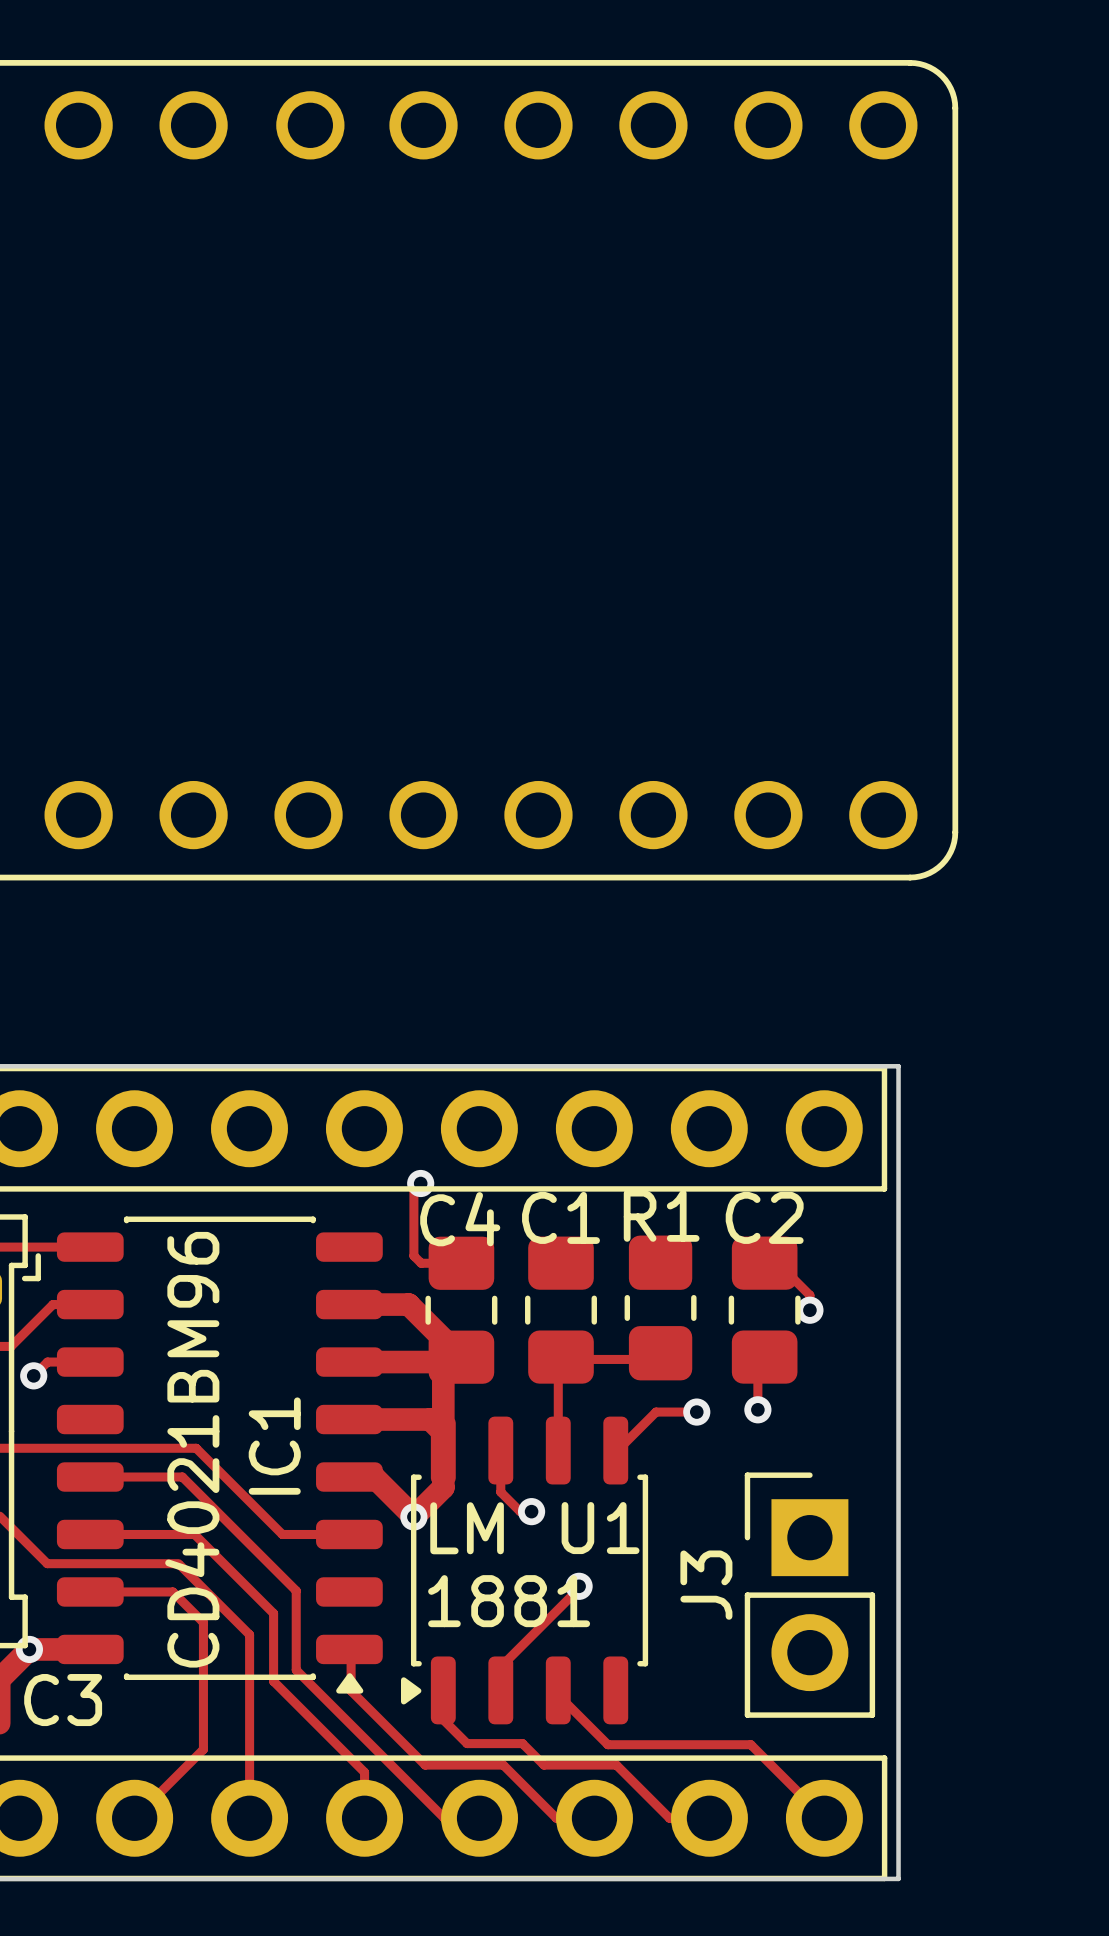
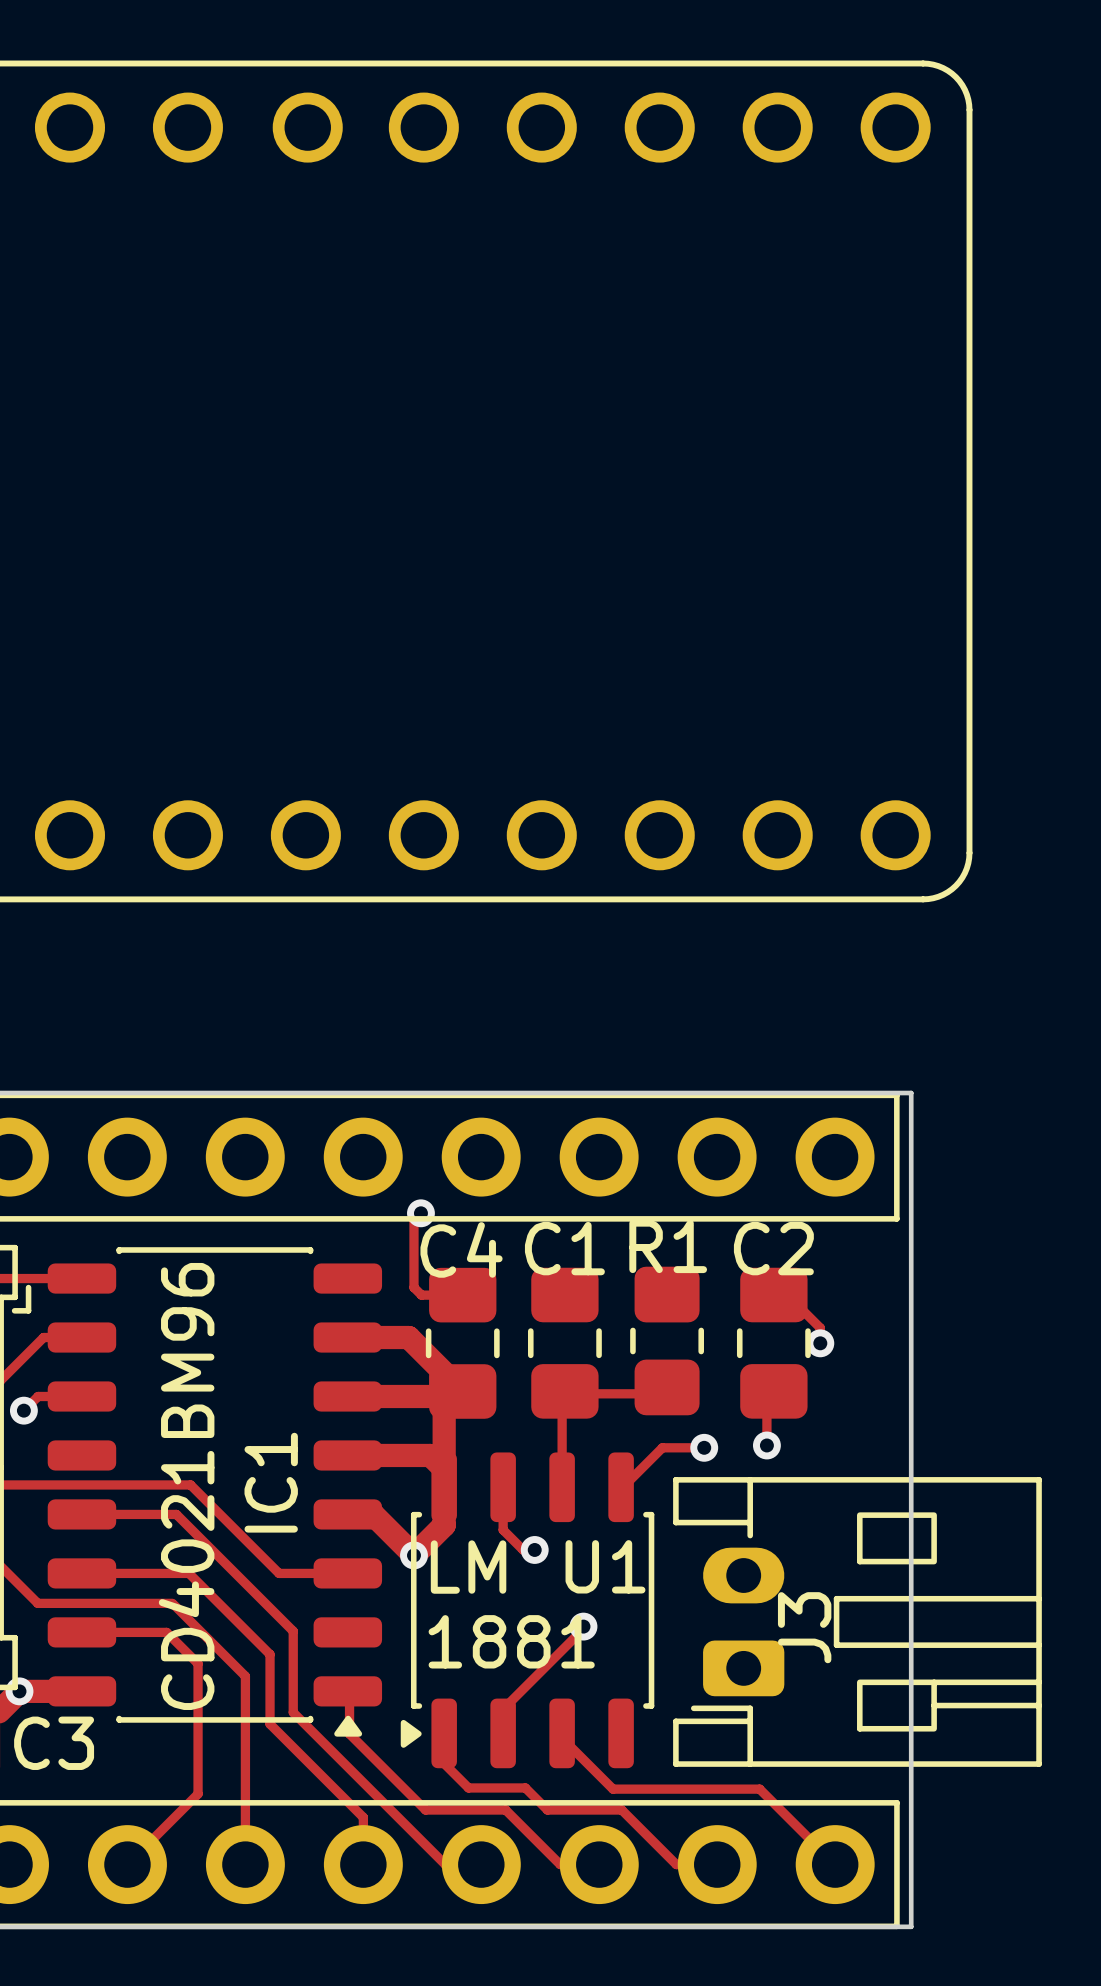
J3 footprint: [744, 1472, 876, 1718] -> [673, 1477, 1042, 1767]

